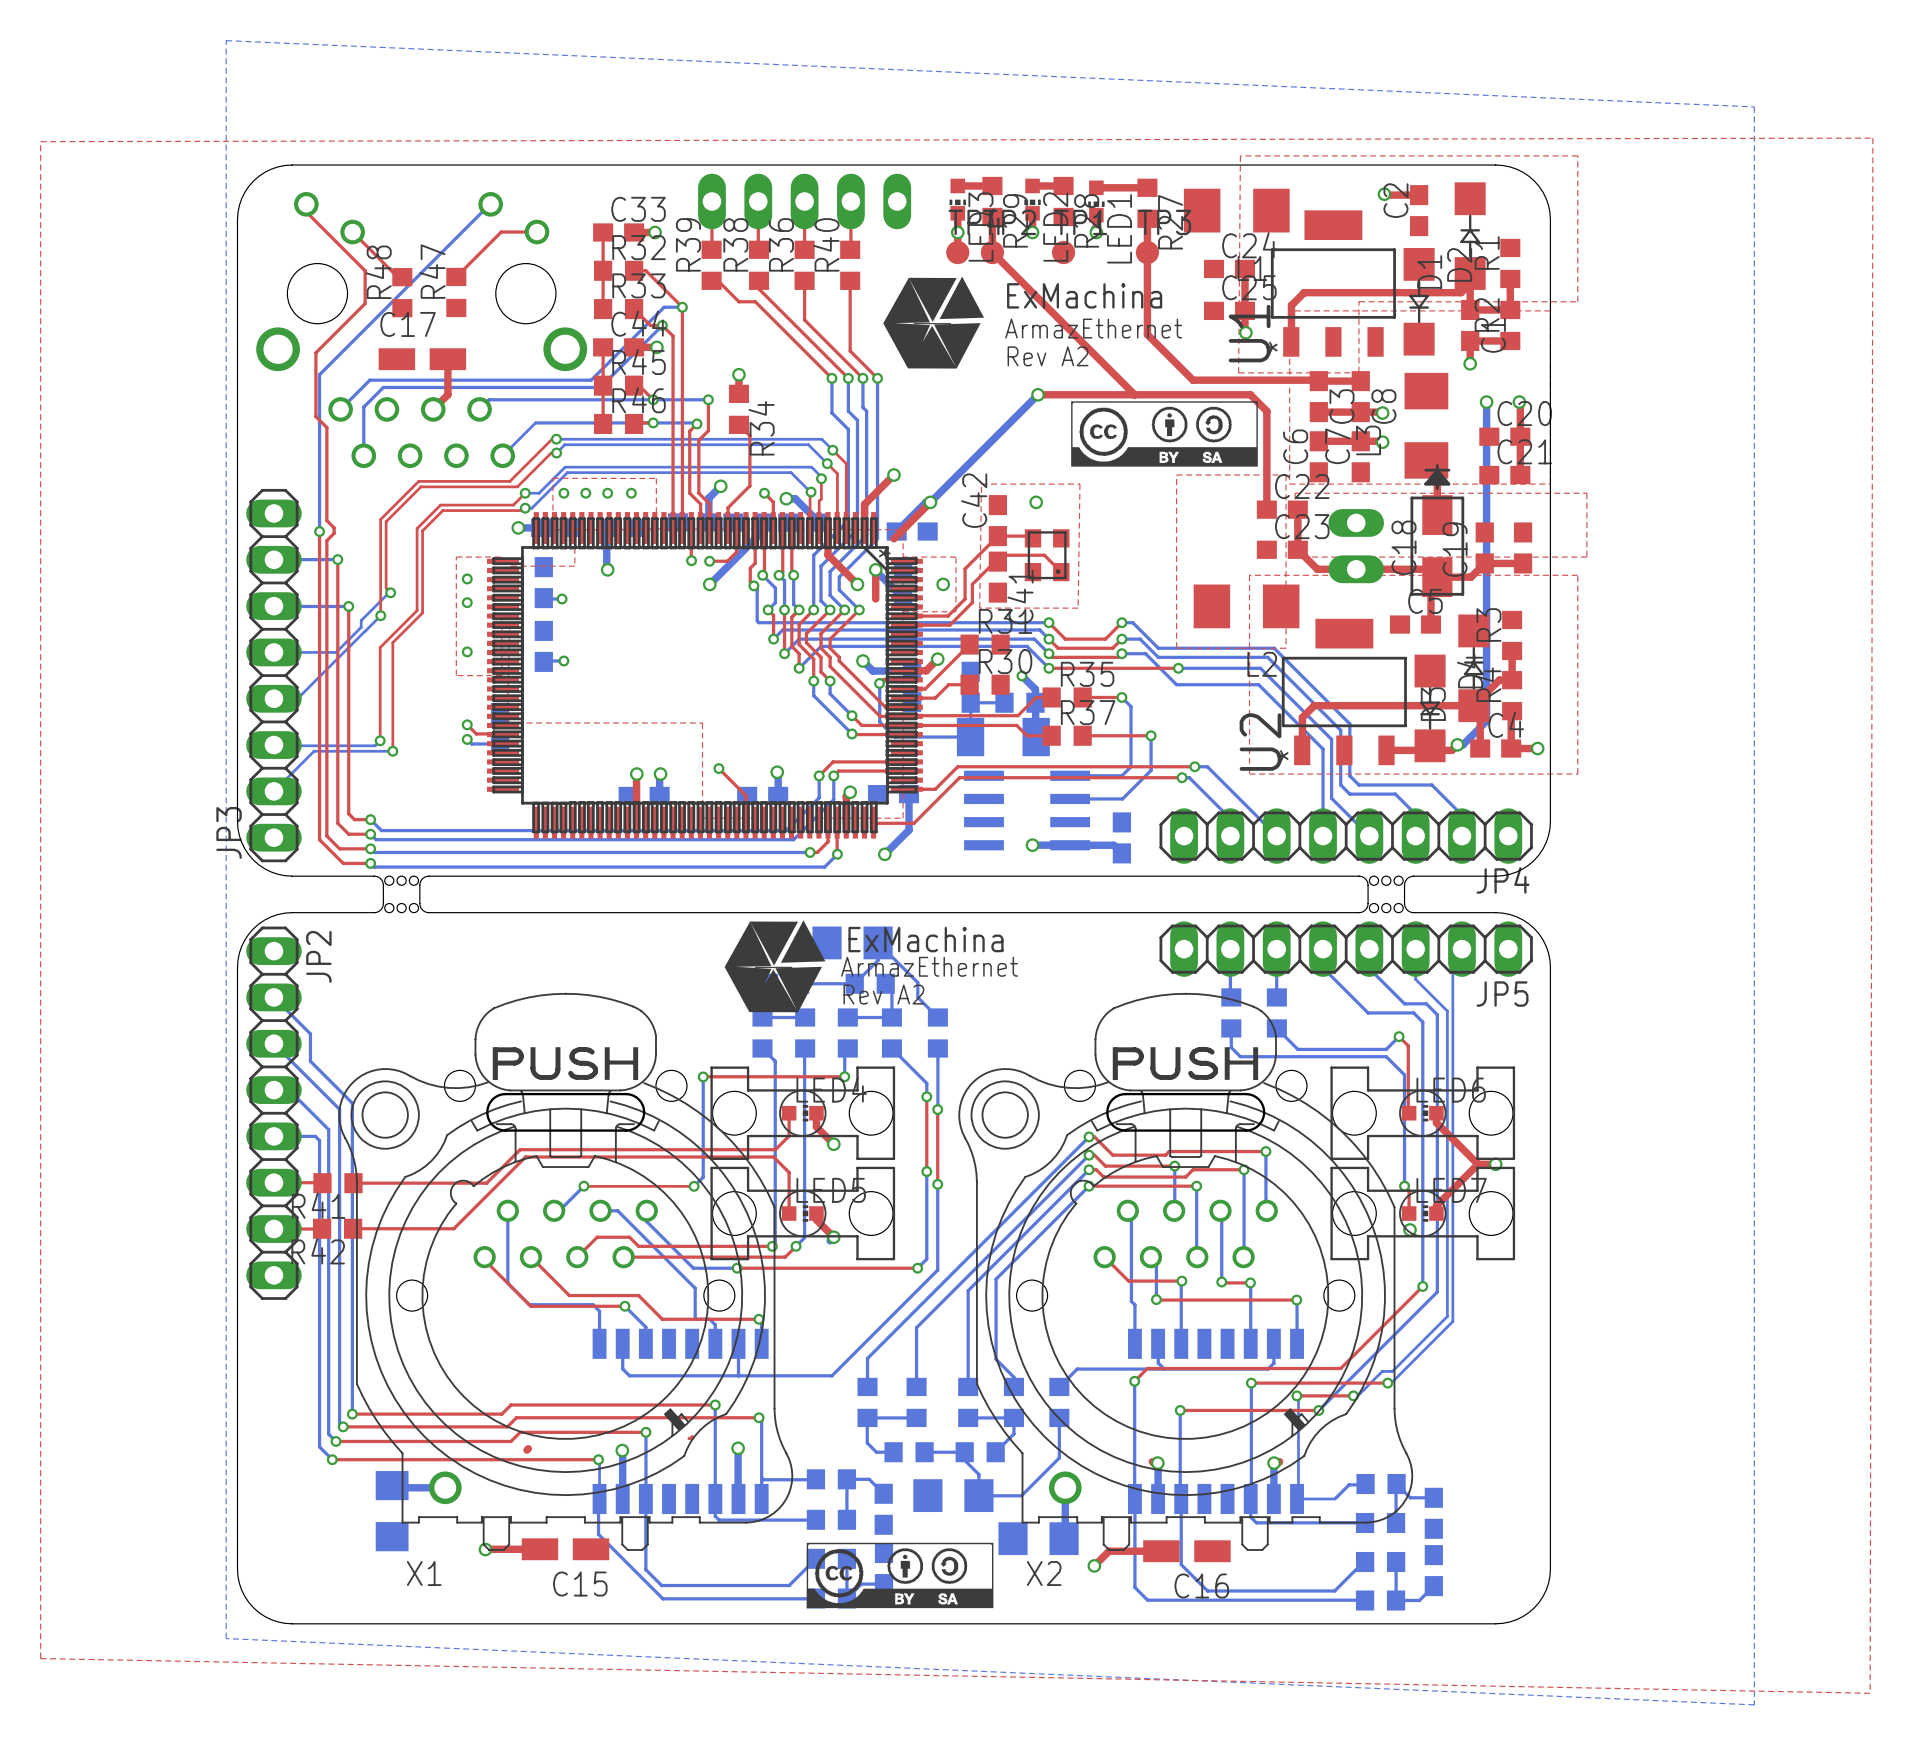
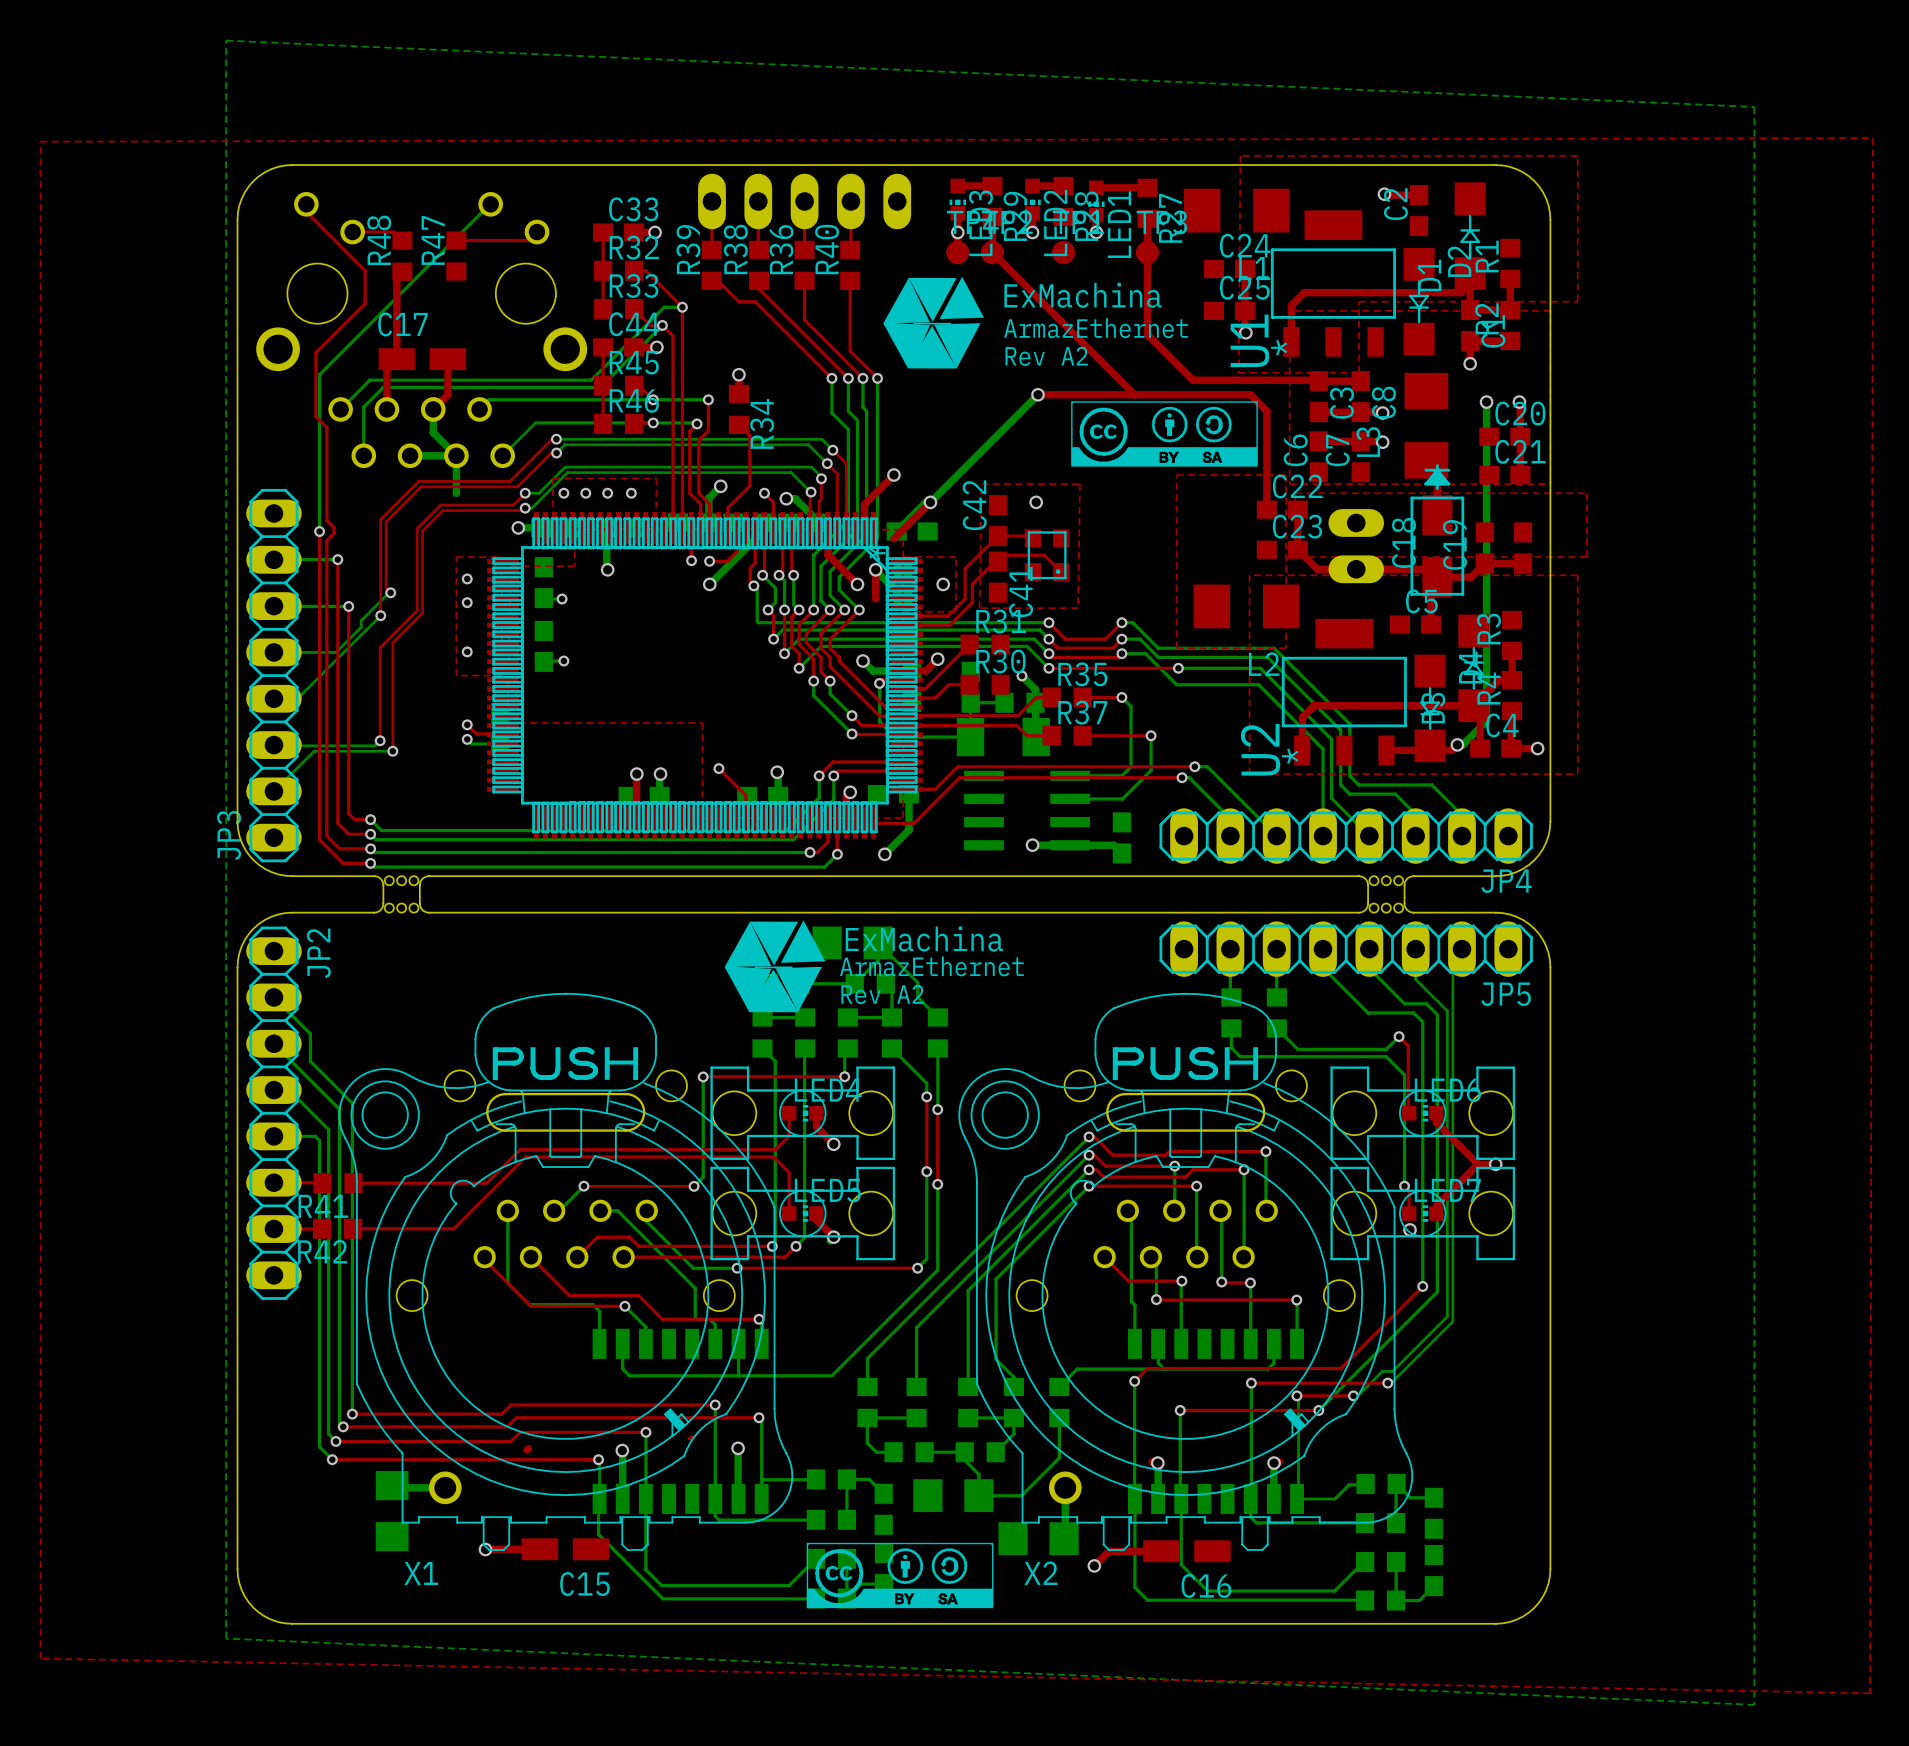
top track: (352, 232) (402, 281) (402, 277) -> (352, 232) (393, 232) (402, 240) (402, 245)
top track: (537, 232) (501, 232) (456, 276) -> (537, 232) (528, 240) (456, 240)
top track: none -> (402, 271) (396, 277) (396, 359) (386, 369) (386, 409)
R48 position: (402, 292) -> (402, 256)
R47 position: (456, 292) -> (456, 256)
bottom track: none -> (433, 409) (433, 432) (456, 455)
bottom track: none -> (410, 455) (456, 455)
bottom track: none -> (456, 455) (456, 493)

